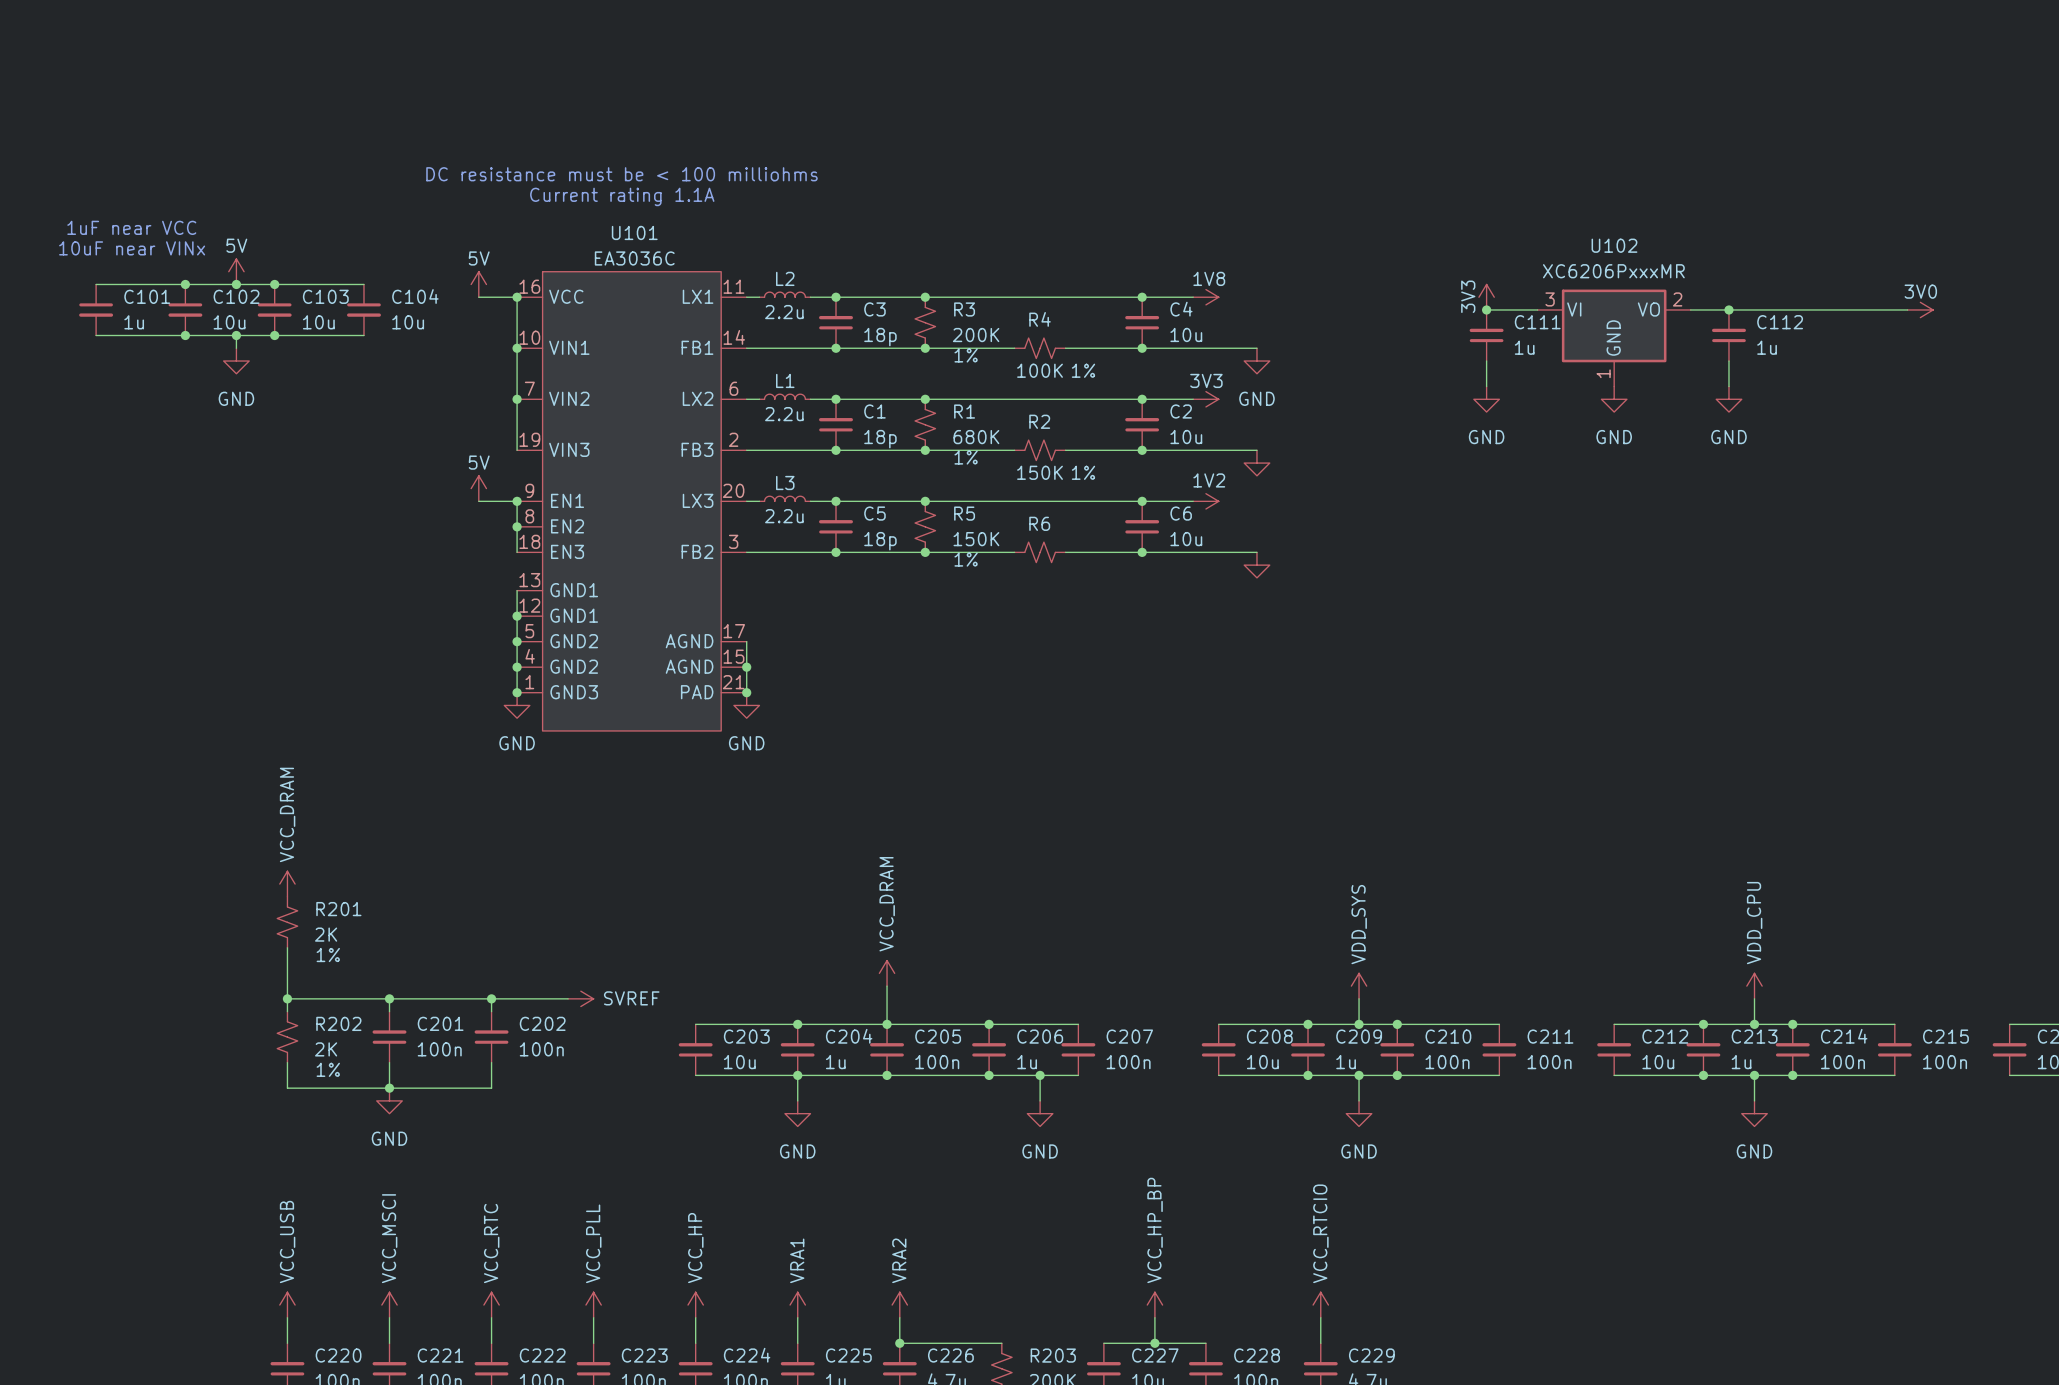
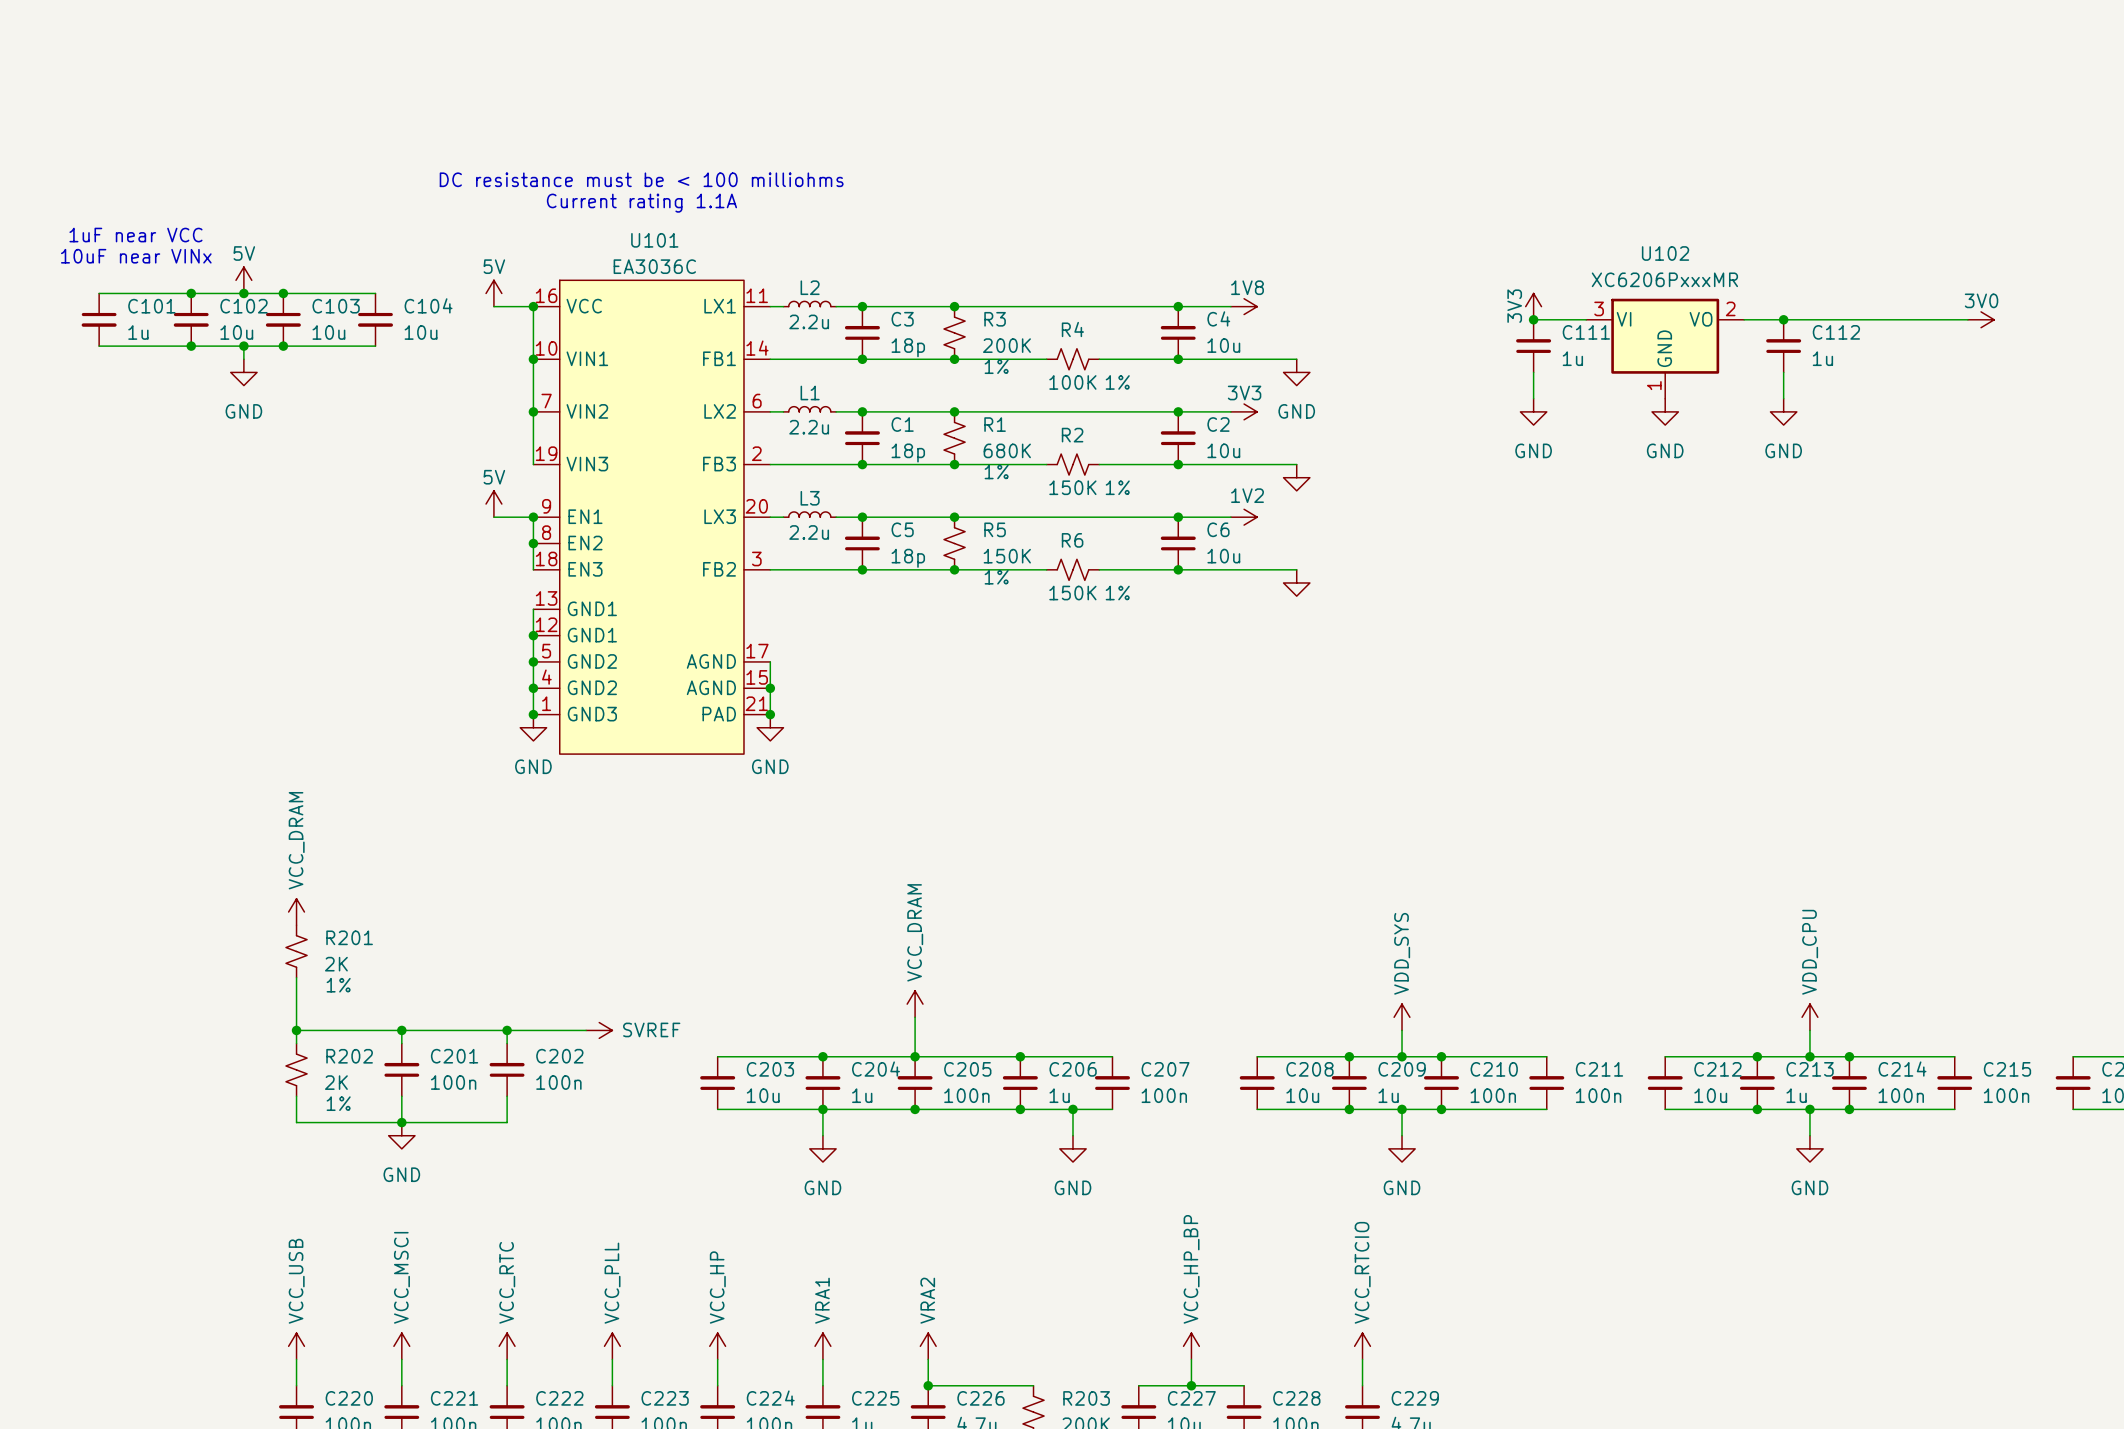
R6 value: none -> 150K (1072, 593)
R6 text: none -> 1% (1117, 593)

